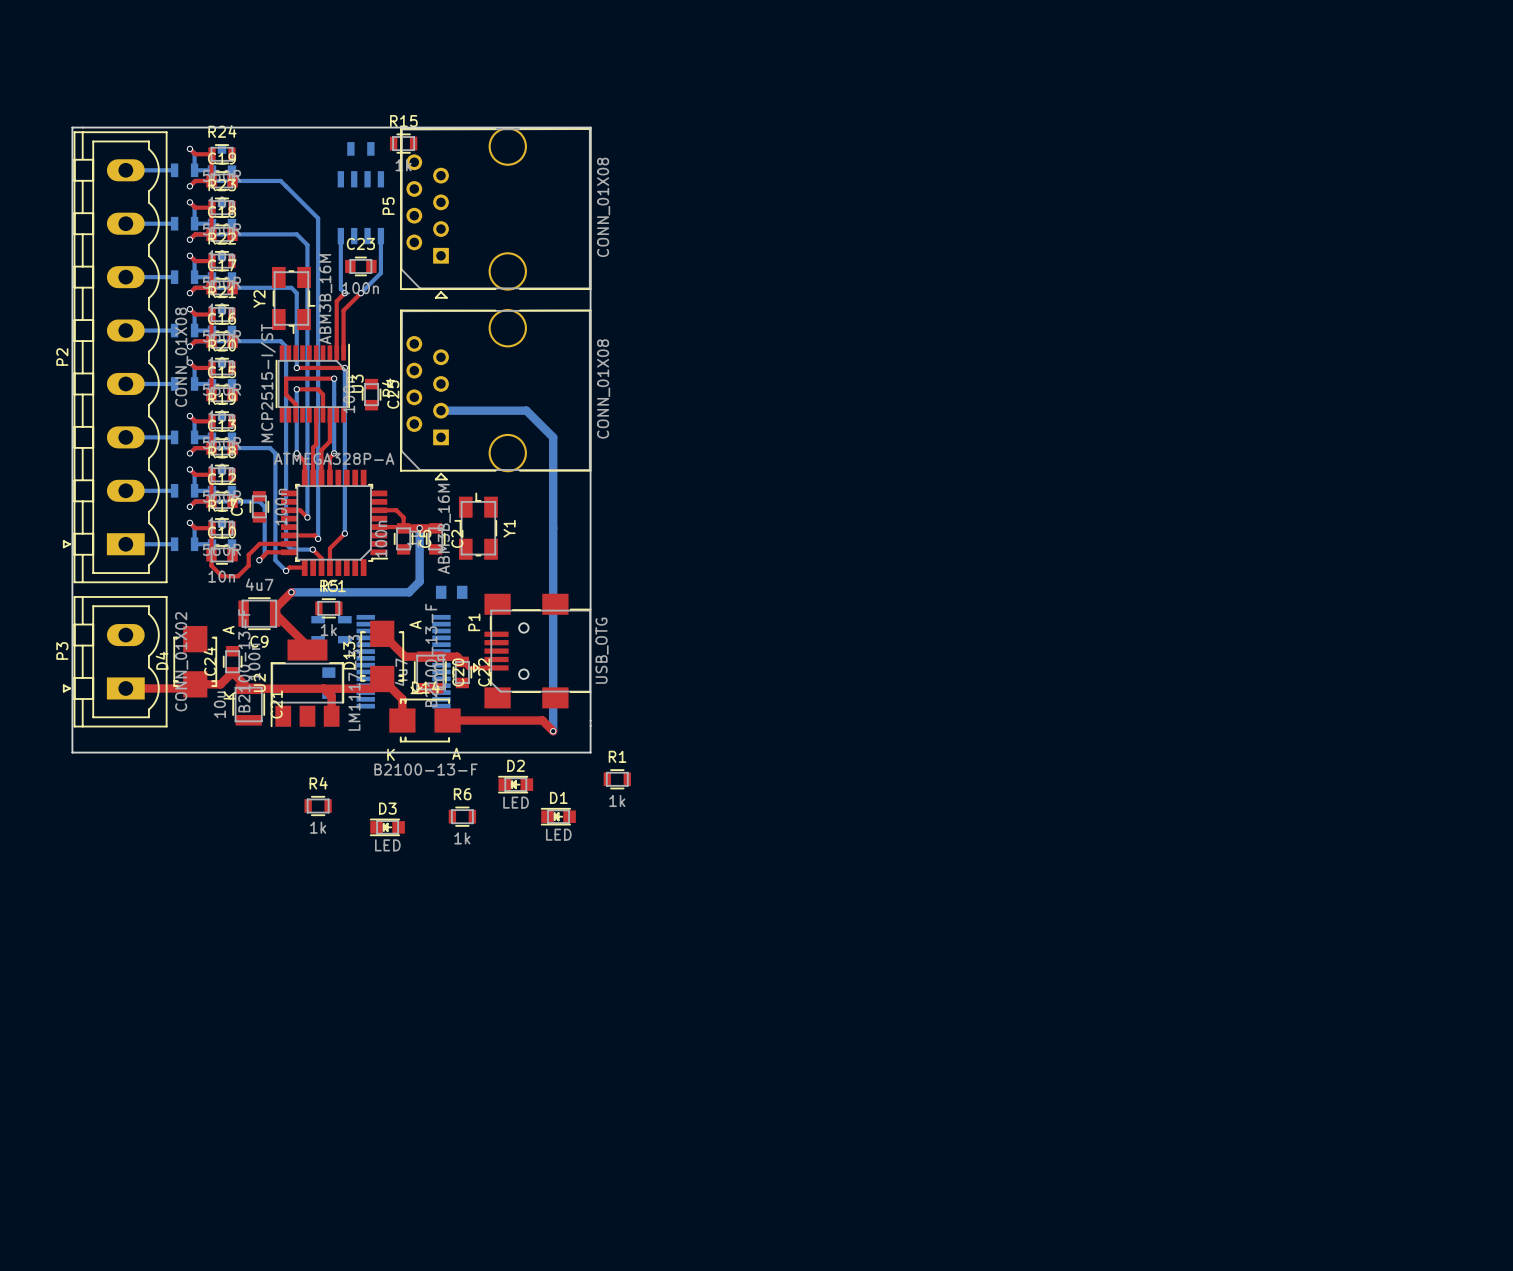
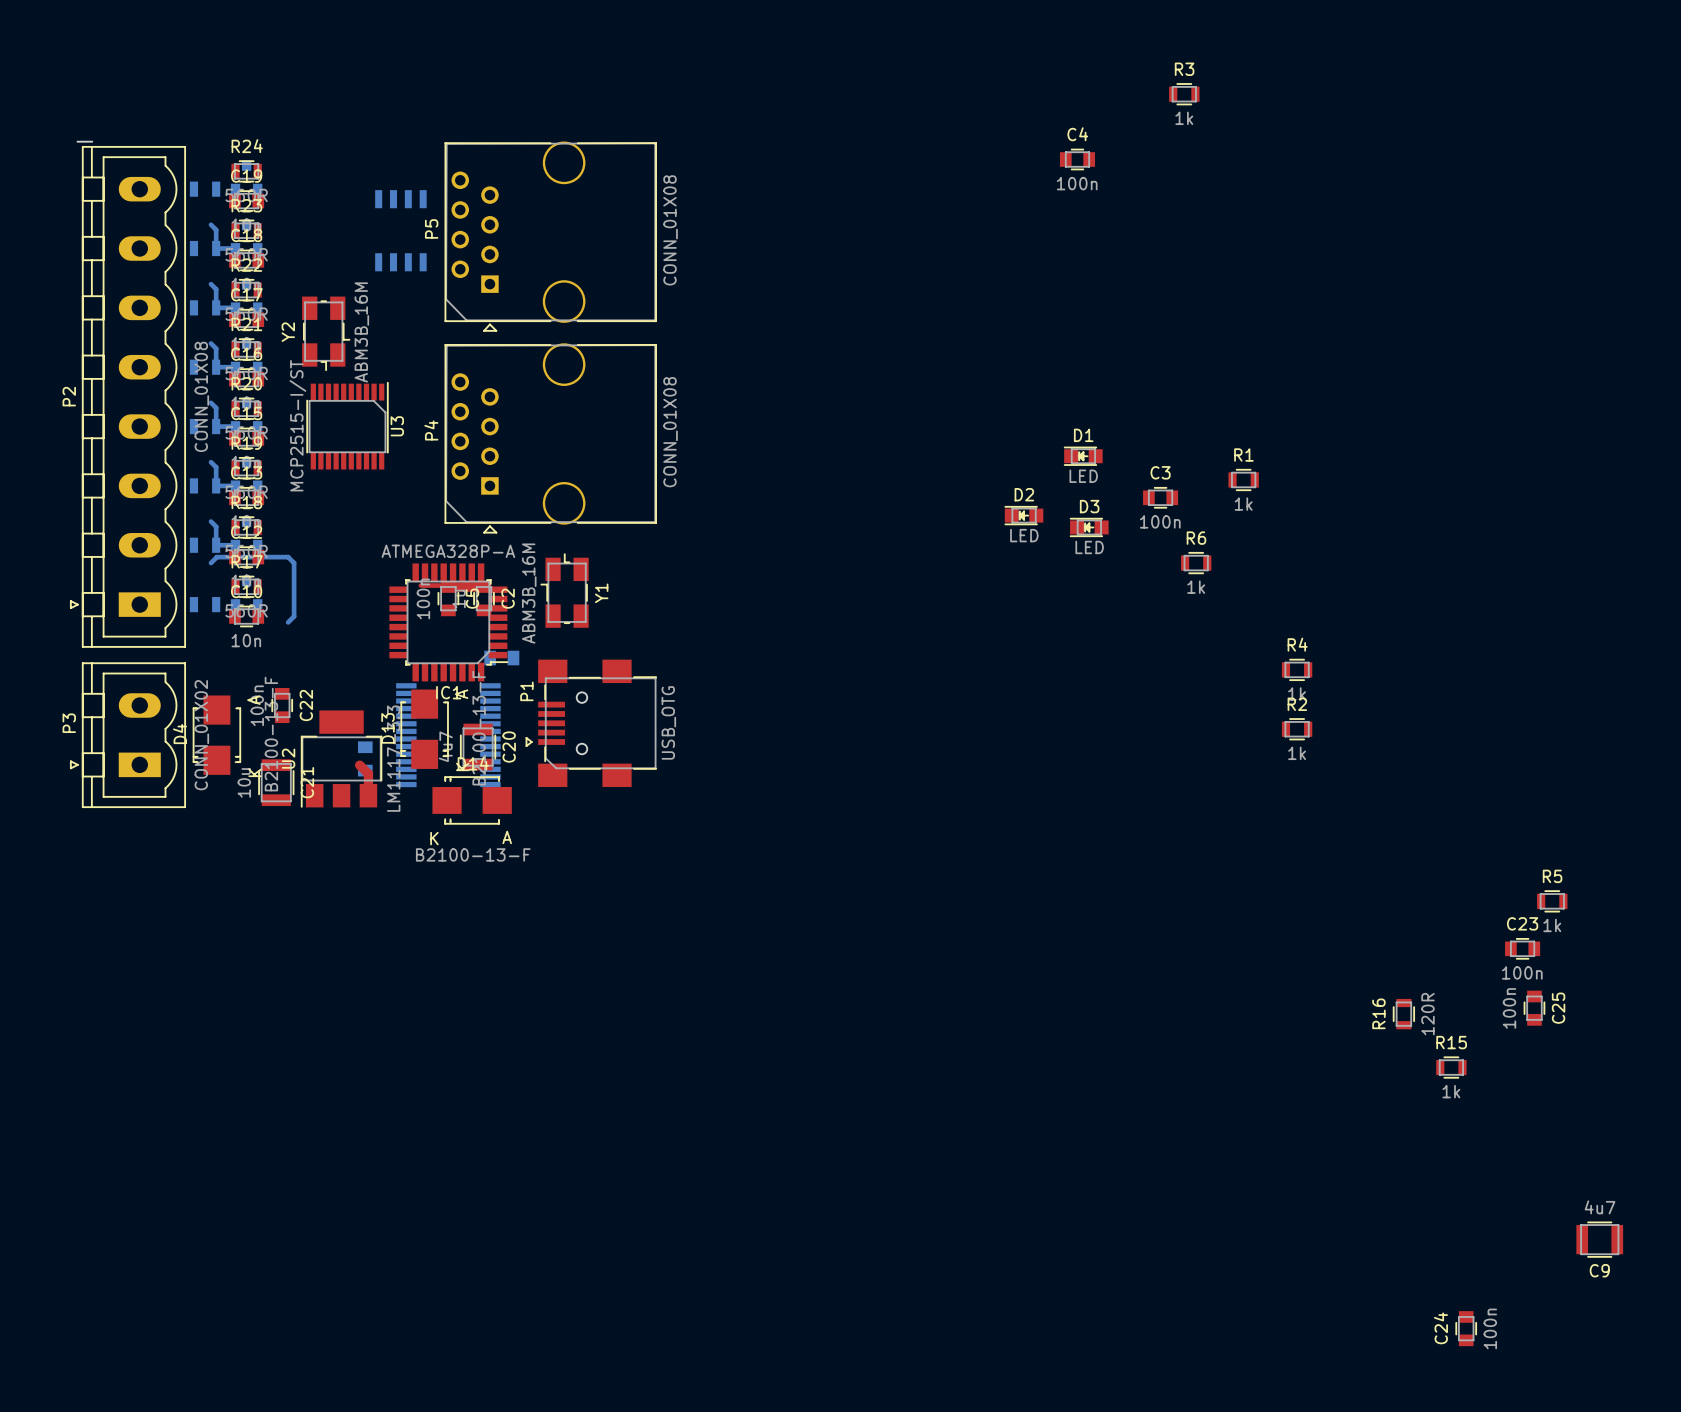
R3: none -> 1k (1184, 94)
board edge: (72, 127) (72, 752) (590, 752) (590, 127) (83, 127) -> (80, 141) (77, 141)
R15 position: (403, 143) -> (1451, 1067)
C4: none -> 100n (1077, 159)
top track: (189, 148) (195, 154) (211, 154) (211, 180) (195, 180) (189, 186) -> none
bottom track: (189, 148) (194, 153) (194, 170) (211, 170) -> none
via: (189, 148) -> none
part: (360, 148) -> none
bottom track: (125, 170) (174, 170) -> none
bottom track: (189, 186) (195, 180) (280, 180) (318, 218) (318, 538) -> none
via: (189, 186) -> none
top track: (189, 202) (195, 207) (211, 207) (211, 234) (195, 234) (189, 239) -> none
via: (189, 202) -> none
bottom track: (125, 223) (174, 223) -> none
bottom track: (340, 236) (340, 289) (344, 293) -> none
bottom track: (380, 236) (380, 273) (360, 293) -> none
bottom track: (189, 239) (195, 234) (296, 234) (307, 245) (307, 517) -> none
via: (189, 239) -> none
top track: (189, 255) (195, 261) (211, 261) (211, 287) (195, 287) (189, 293) -> none
via: (189, 255) -> none
C23 position: (360, 266) -> (1522, 948)
bottom track: (125, 277) (174, 277) -> none
bottom track: (189, 293) (195, 287) (291, 287) (296, 293) (296, 367) -> none
via: (189, 293) -> none
top track: (344, 293) (336, 301) (336, 352) -> none
via: (344, 293) -> none
top track: (360, 293) (343, 310) (343, 352) -> none
via: (360, 293) -> none
top track: (189, 309) (195, 314) (211, 314) (211, 341) (195, 341) (189, 346) -> none
via: (189, 309) -> none
bottom track: (125, 330) (174, 330) -> none
bottom track: (189, 346) (195, 341) (280, 341) (286, 346) (286, 544) (291, 549) (312, 549) -> none
via: (189, 346) -> none
top track: (189, 362) (195, 367) (211, 367) (211, 394) -> none
via: (189, 362) -> none
top track: (296, 367) (344, 367) -> none
via: (296, 367) -> none
bottom track: (344, 367) (344, 533) -> none
via: (344, 367) -> none
top track: (334, 378) (286, 378) (286, 394) (295, 404) (295, 414) -> none
bottom track: (334, 378) (334, 453) -> none
via: (334, 378) -> none
bottom track: (125, 383) (174, 383) -> none
top track: (296, 389) (318, 389) (323, 394) (323, 414) -> none
bottom track: (296, 389) (296, 453) -> none
via: (296, 389) -> none
C25 position: (371, 394) -> (1534, 1008)
bottom track: (441, 410) (526, 410) (553, 437) (553, 731) -> none
top track: (316, 414) (313, 478) -> none
top track: (329, 414) (329, 441) (321, 450) (321, 478) -> none
top track: (189, 416) (195, 421) (211, 421) (211, 448) (195, 448) (189, 453) -> none
via: (189, 416) -> none
bottom track: (125, 437) (174, 437) -> none
bottom track: (189, 453) (195, 448) (270, 448) (275, 453) (275, 560) (286, 570) -> none
via: (189, 453) -> none
top track: (296, 453) (304, 461) (304, 478) -> none
via: (296, 453) -> none
top track: (334, 453) (329, 457) (329, 478) -> none
via: (334, 453) -> none
top track: (189, 469) (195, 474) (211, 474) (211, 501) (195, 501) (189, 506) -> none
via: (189, 469) -> none
bottom track: (125, 490) (174, 490) -> none
via: (189, 506) -> none
C3 rotation: 0° (259, 506) -> 90° clockwise (1160, 497)
C3 position: (259, 506) -> (1160, 497)
top track: (289, 510) (300, 510) (307, 517) -> none
top track: (378, 510) (396, 510) (403, 517) (403, 528) -> none
via: (307, 517) -> none
top track: (189, 522) (195, 528) (211, 528) (211, 565) (221, 576) (238, 576) (248, 565) (248, 554) (259, 543) (289, 543) -> none
bottom track: (189, 522) (194, 527) (194, 544) (211, 544) -> none
via: (189, 522) -> none
IC1 position: (334, 522) -> (448, 622)
Y1 position: (476, 526) -> (564, 590)
bottom track: (419, 528) (419, 581) (408, 592) (291, 592) -> none
via: (419, 528) -> none
top track: (344, 533) (329, 548) (329, 567) -> none
via: (344, 533) -> none
top track: (289, 535) (314, 535) (318, 538) -> none
via: (318, 538) -> none
bottom track: (125, 544) (174, 544) -> none
top track: (312, 549) (321, 558) (321, 567) -> none
via: (312, 549) -> none
top track: (289, 552) (267, 552) (259, 560) -> none
via: (259, 560) -> none
top track: (304, 567) (289, 567) (286, 570) -> none
via: (286, 570) -> none
top track: (291, 592) (275, 608) (275, 613) (307, 645) (307, 650) -> none
via: (291, 592) -> none
R5 position: (328, 608) -> (1552, 901)
C9 position: (259, 613) -> (1599, 1239)
part: (318, 629) -> none
part: (344, 629) -> none
top track: (382, 633) (405, 656) (457, 656) (468, 667) (496, 667) -> none
R2: none -> 1k (1297, 729)
C24 position: (232, 661) -> (1466, 1328)
C22 position: (462, 672) -> (282, 705)
top track: (125, 688) (191, 688) (195, 684) (220, 684) (232, 672) (248, 688) (372, 688) (382, 679) (402, 699) (402, 720) -> none
top track: (447, 720) (542, 720) (553, 731) -> none
via: (553, 731) -> none
R1 position: (617, 779) -> (1243, 479)
D2 position: (515, 784) -> (1023, 515)
R4 position: (318, 806) -> (1297, 669)
R6 position: (462, 816) -> (1196, 563)
D1 position: (558, 816) -> (1083, 456)
D3 position: (387, 827) -> (1089, 527)
R16: none -> 120R (1403, 1014)

